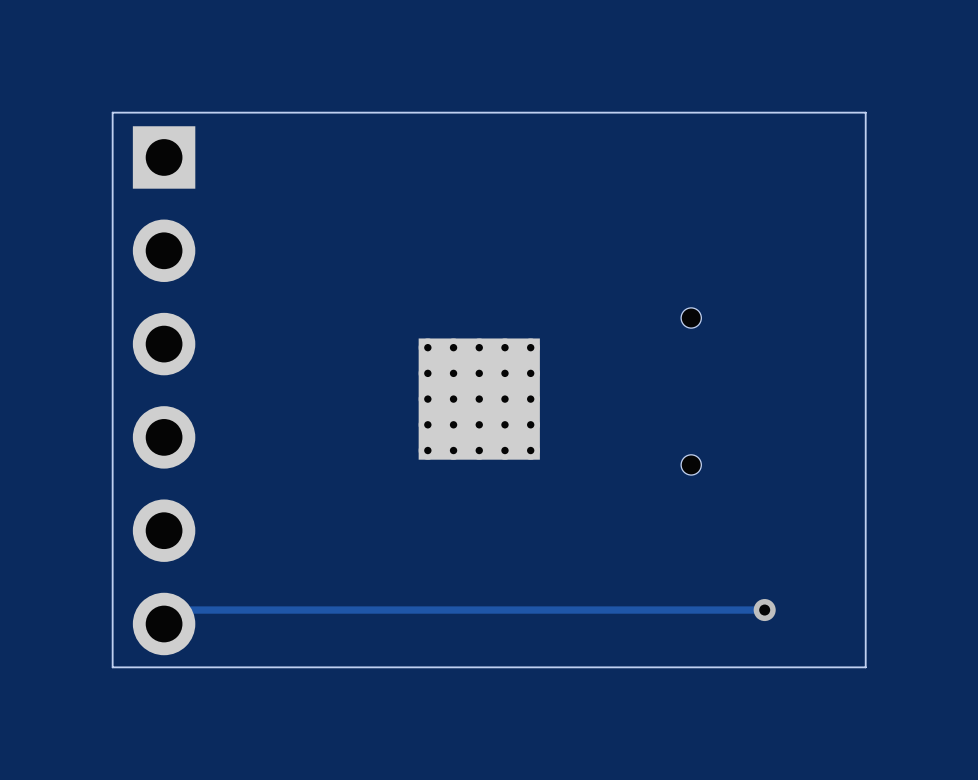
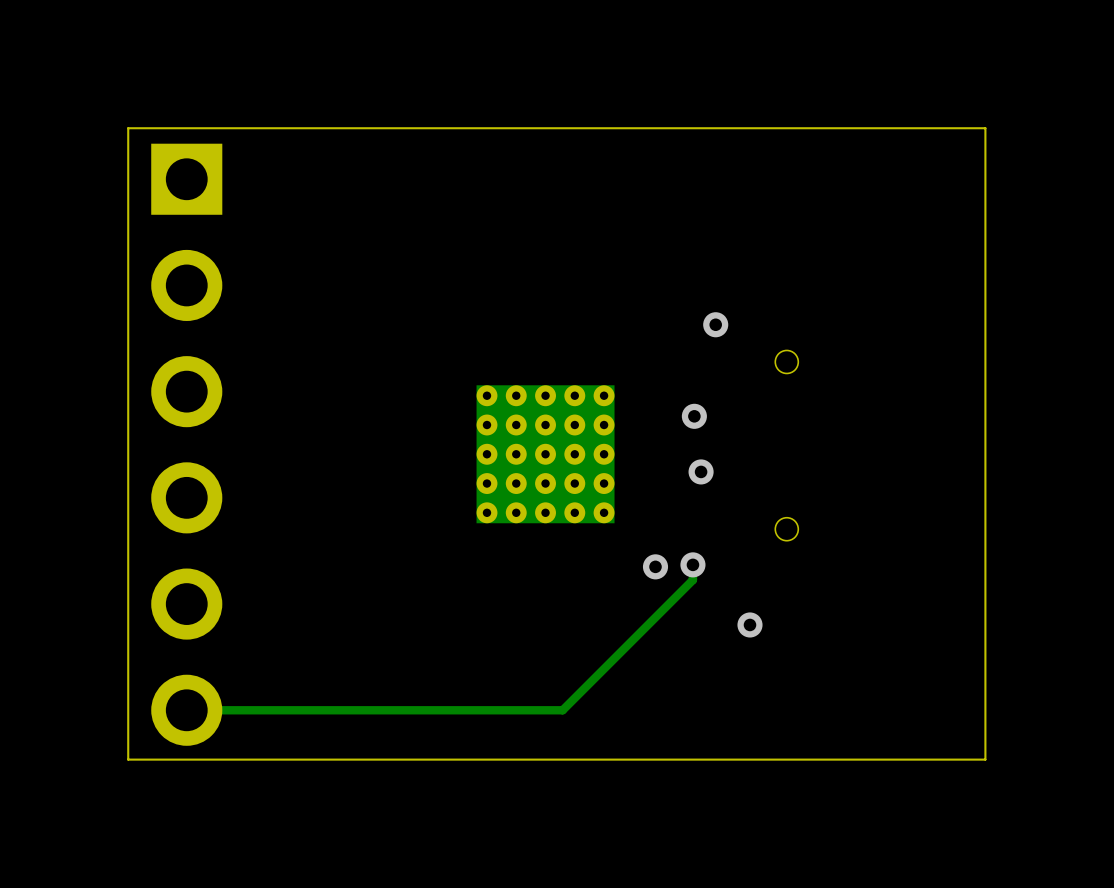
via: none -> (715, 324)
via: none -> (694, 416)
via: none -> (701, 471)
via: none -> (692, 564)
via: none -> (655, 566)
via: none -> (749, 624)
track: (764, 610) (178, 610) (164, 624) -> (692, 564) (692, 579) (562, 710) (186, 710)
via: (764, 610) -> none

